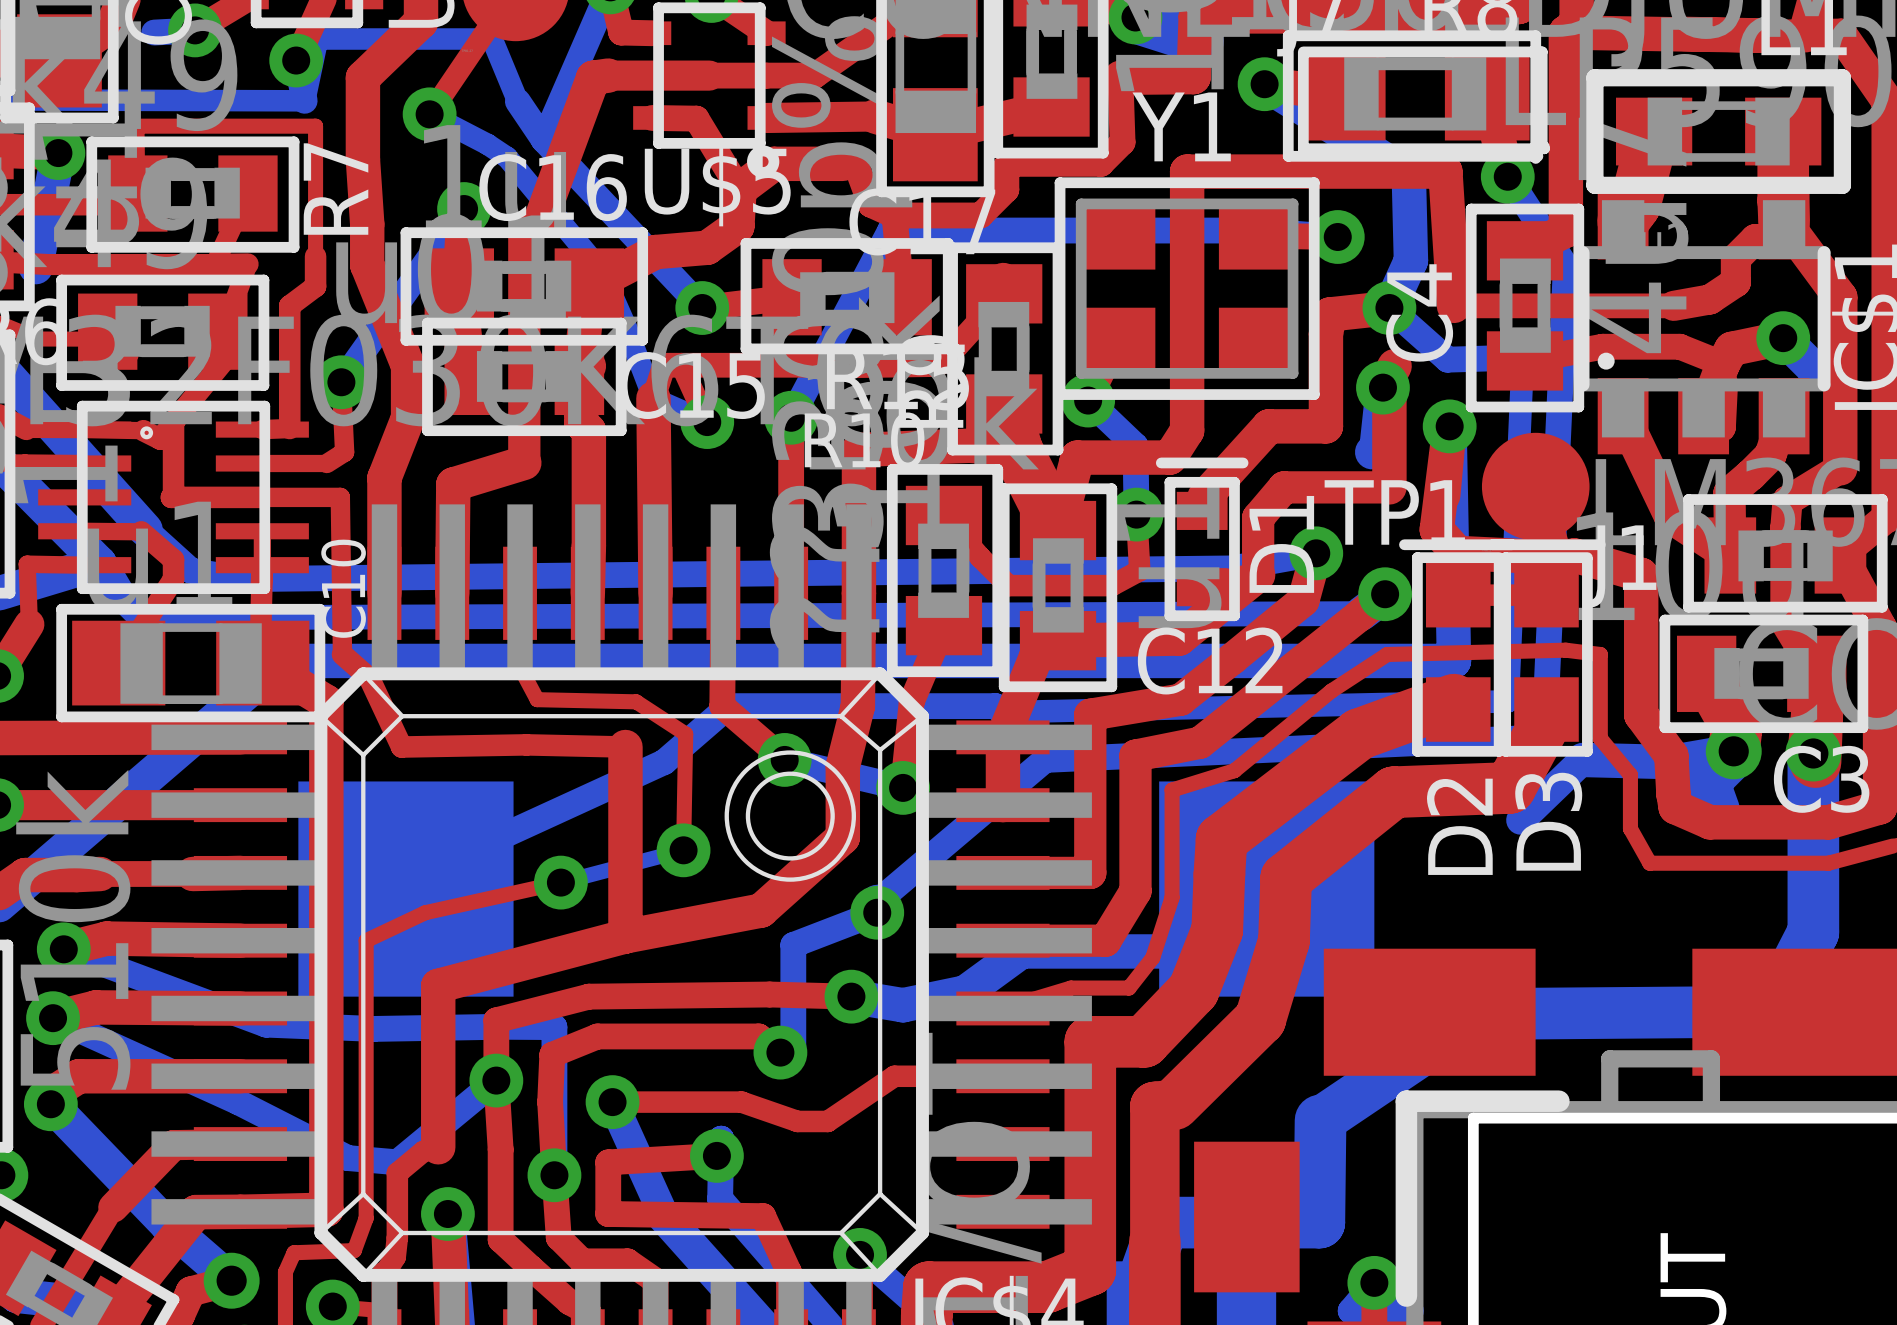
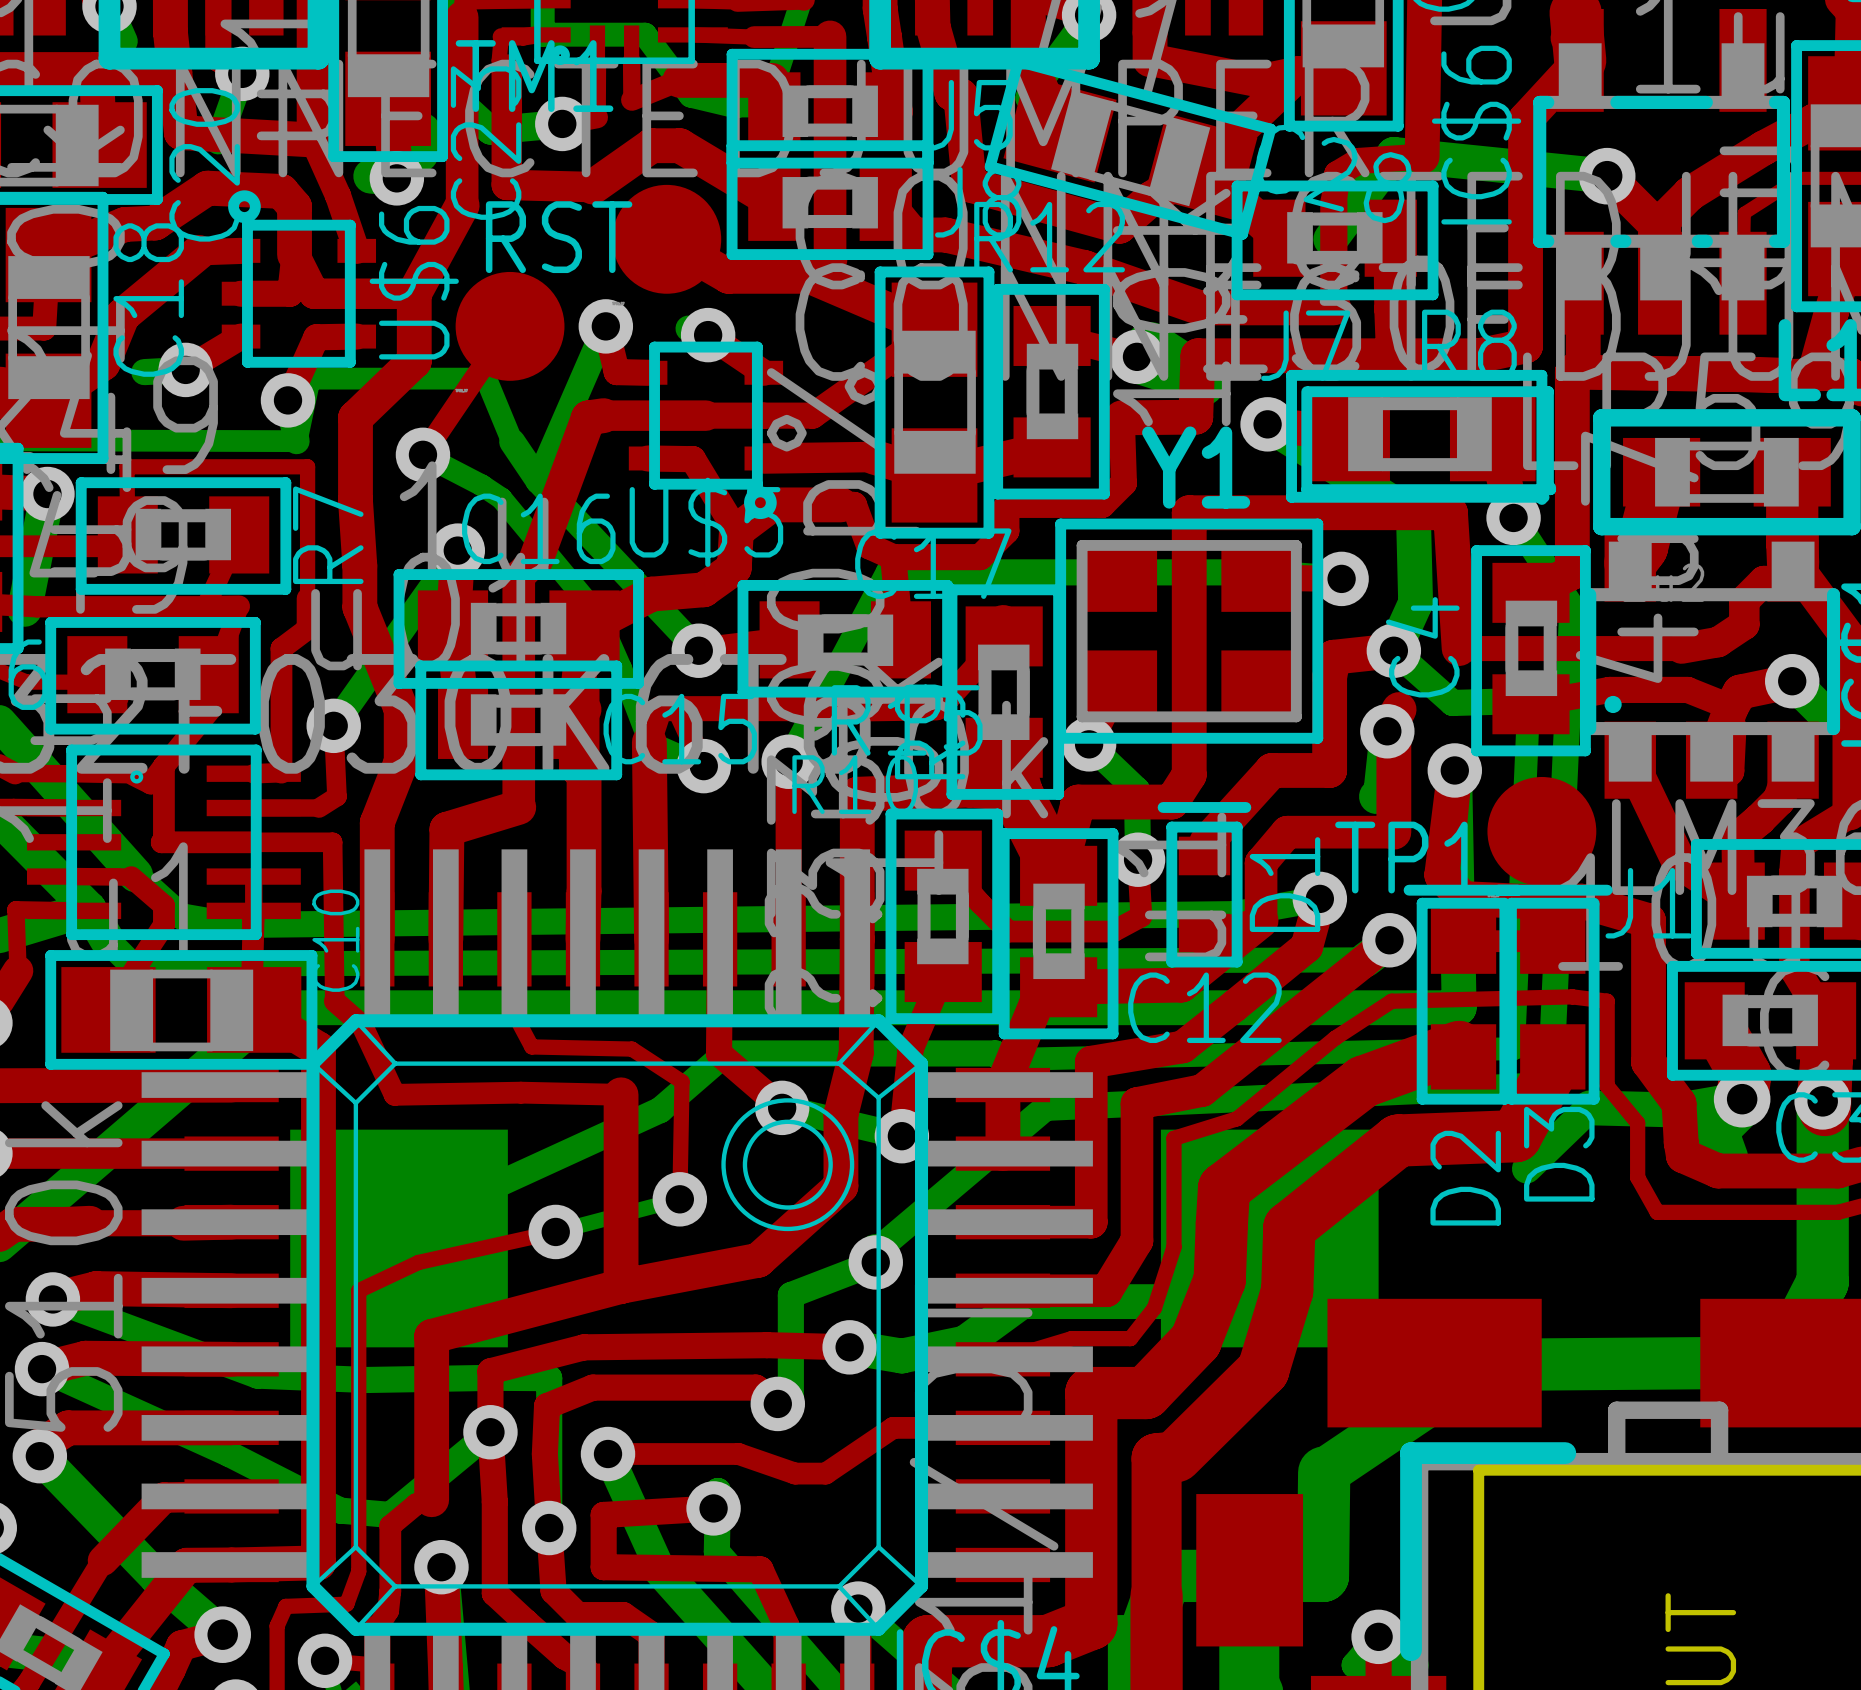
D3 name position: D3 (1548, 821) -> D3 (1559, 1154)

